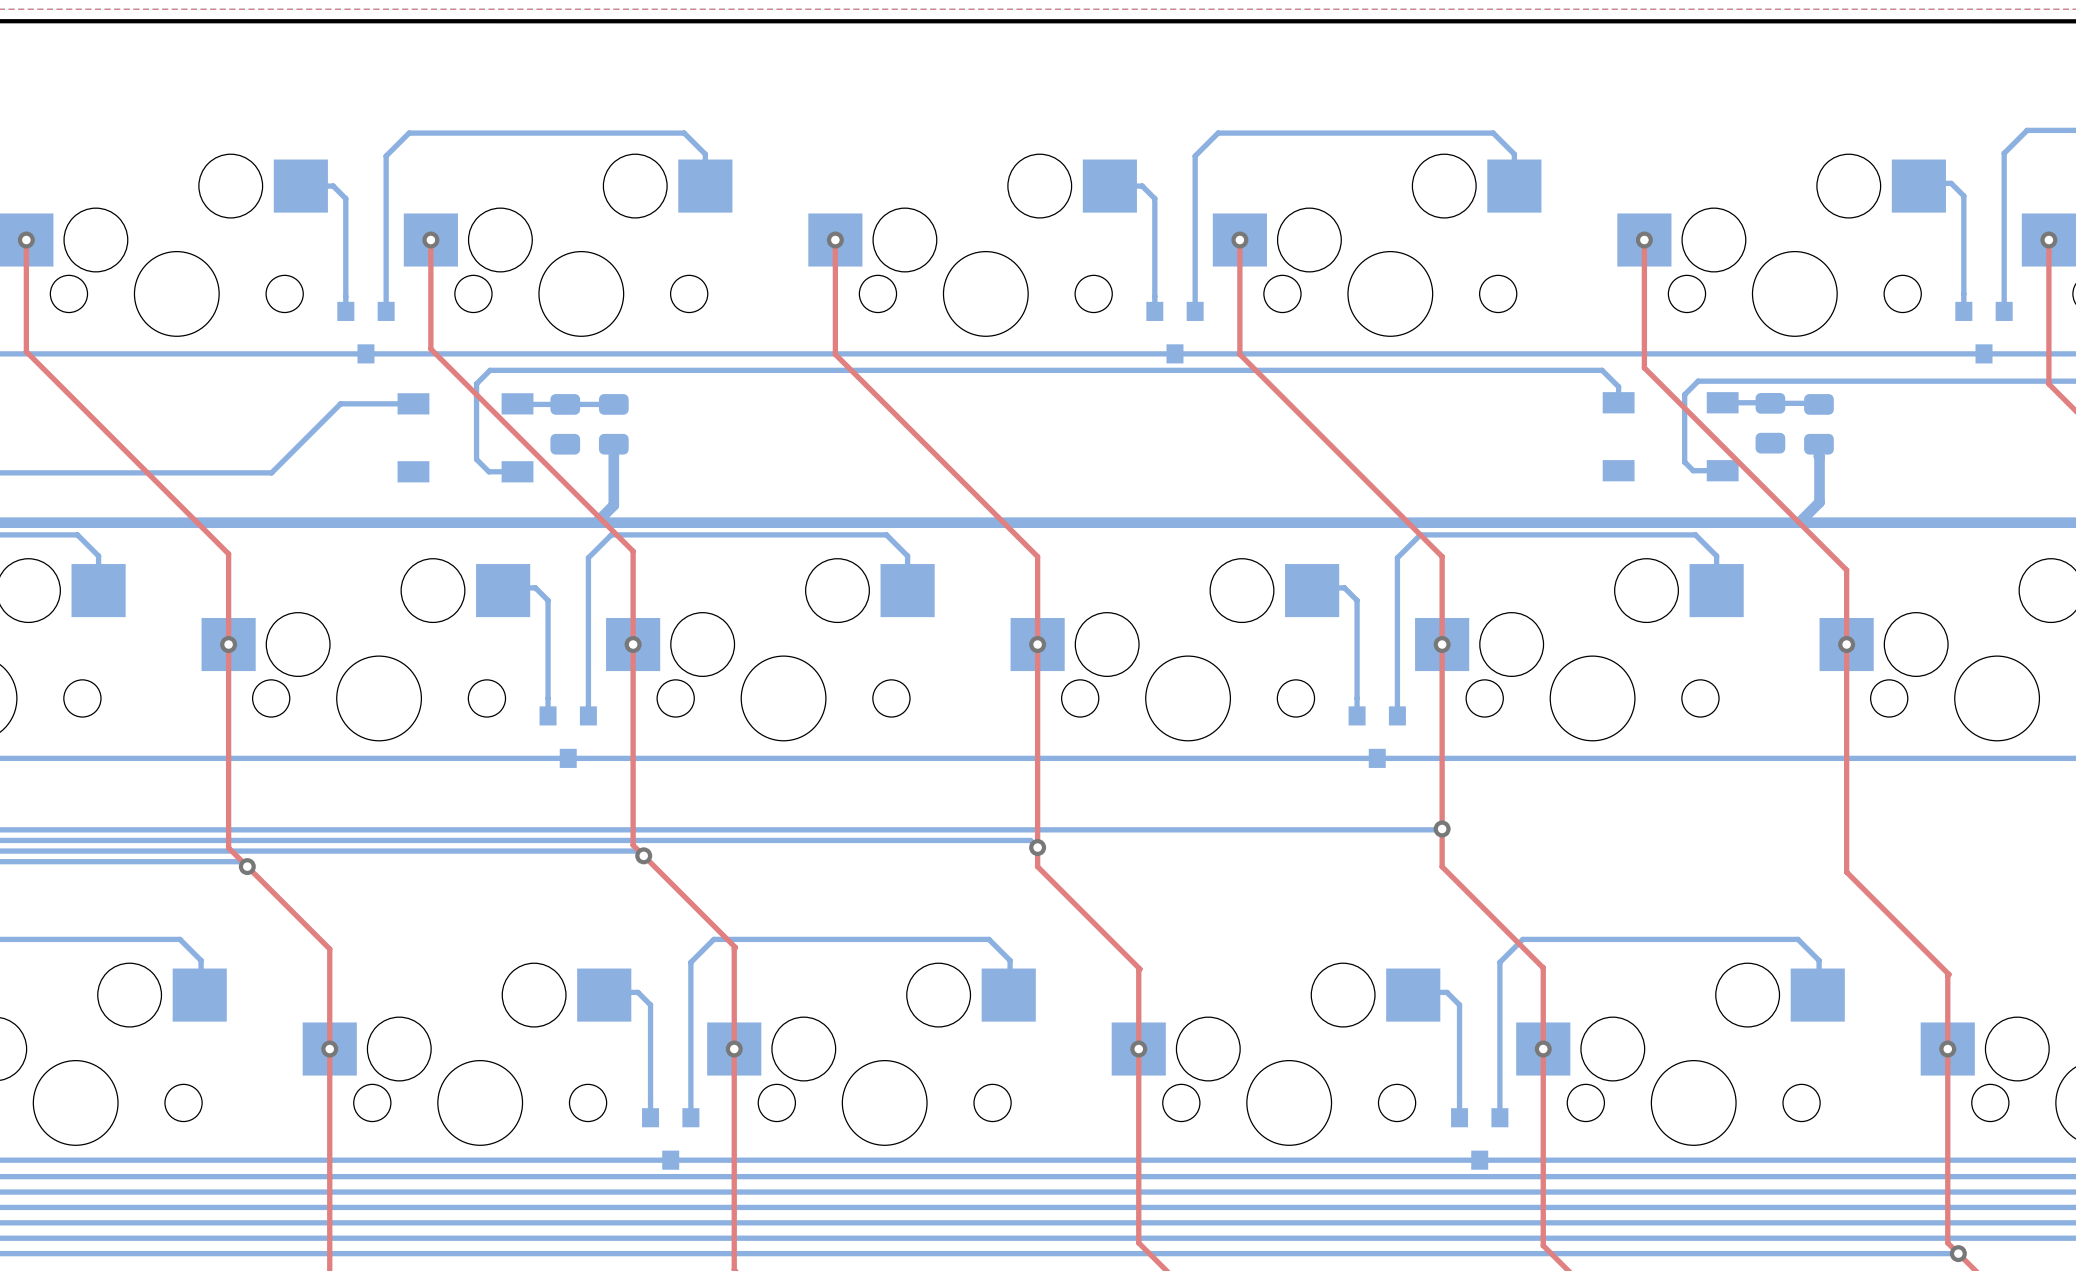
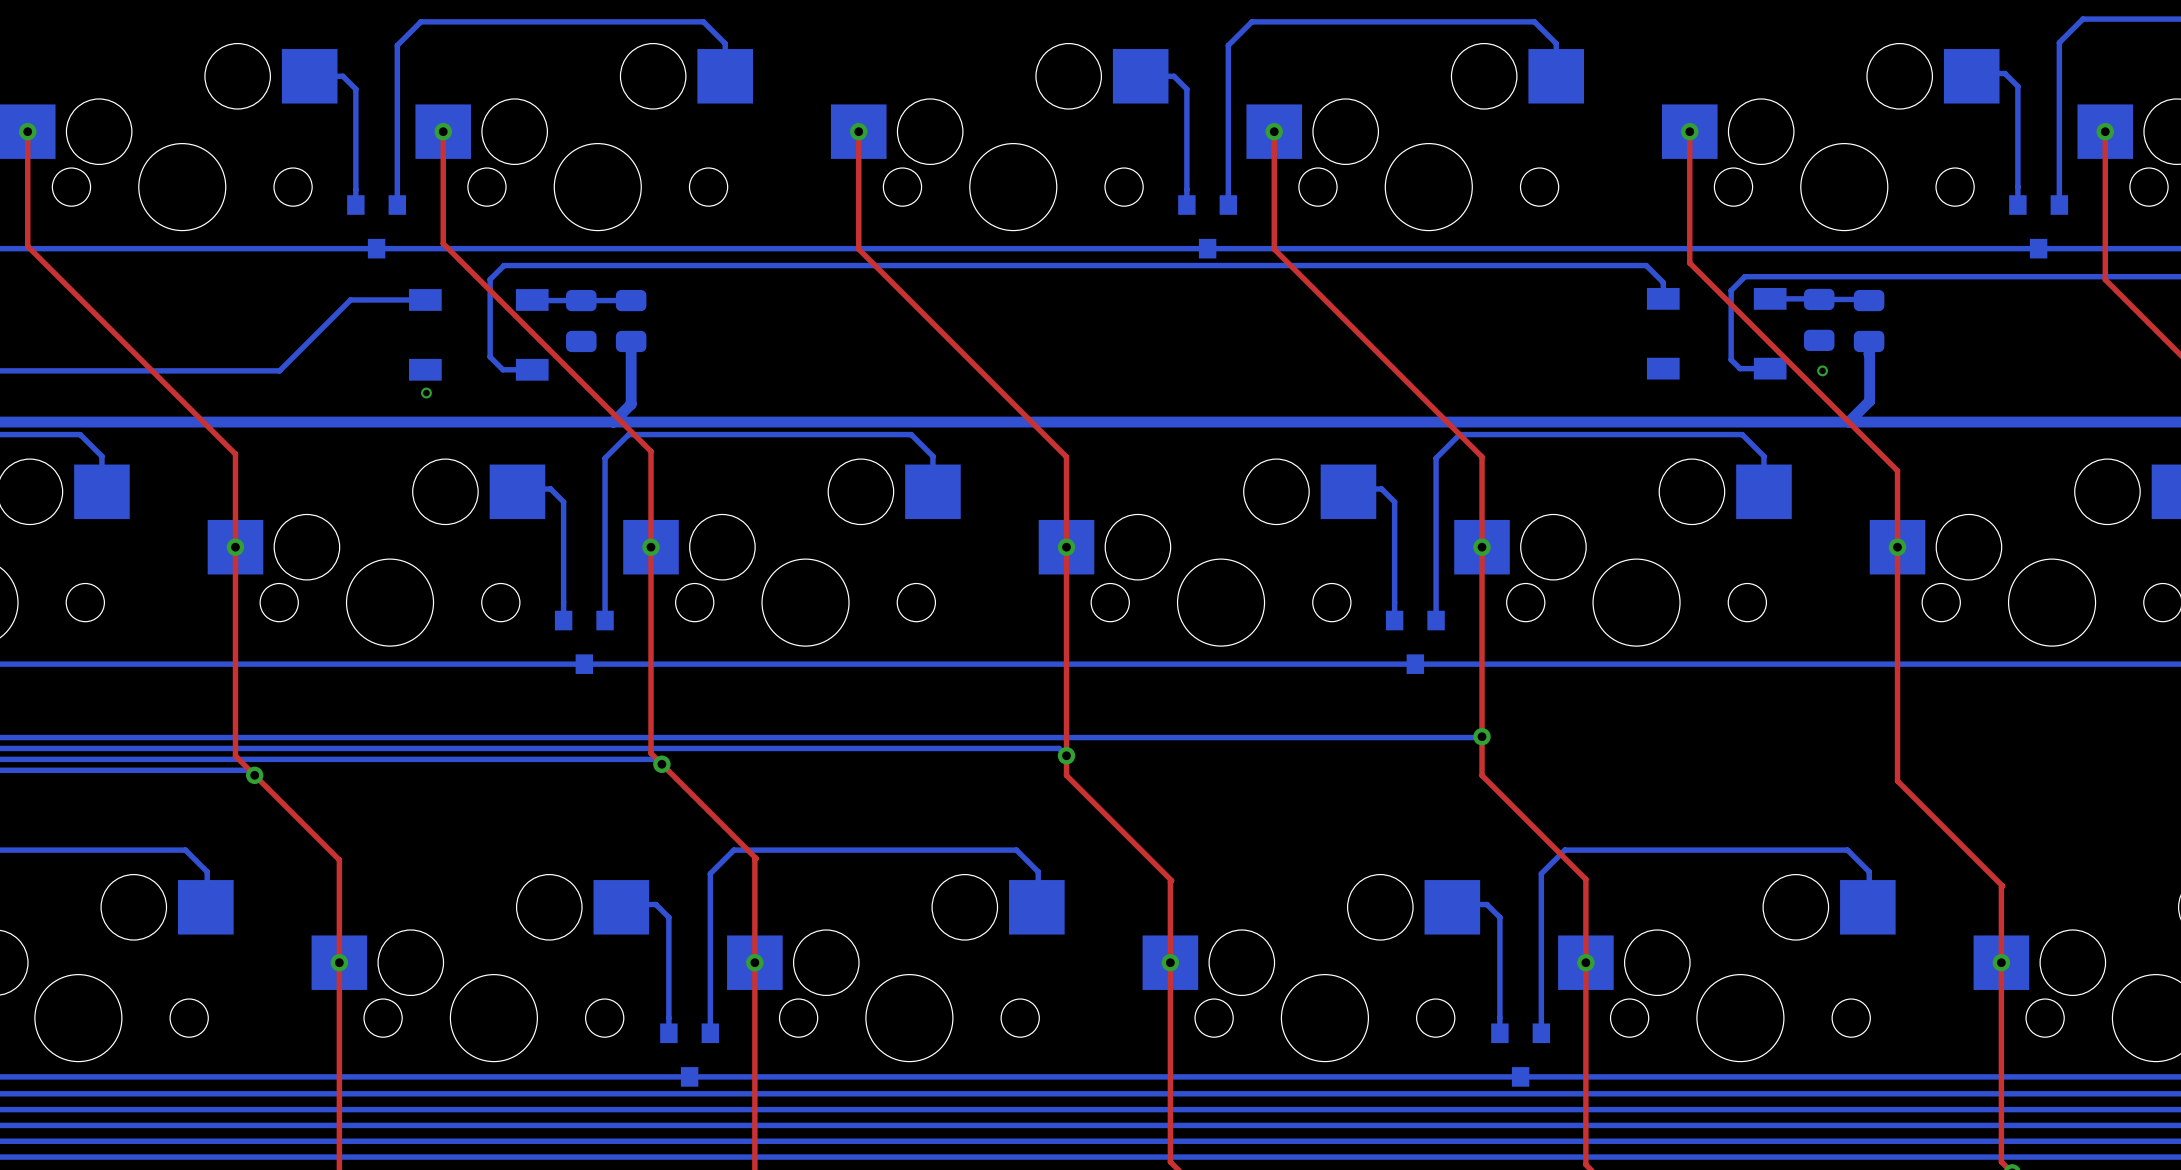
via: none -> (1822, 370)
via: none -> (426, 393)

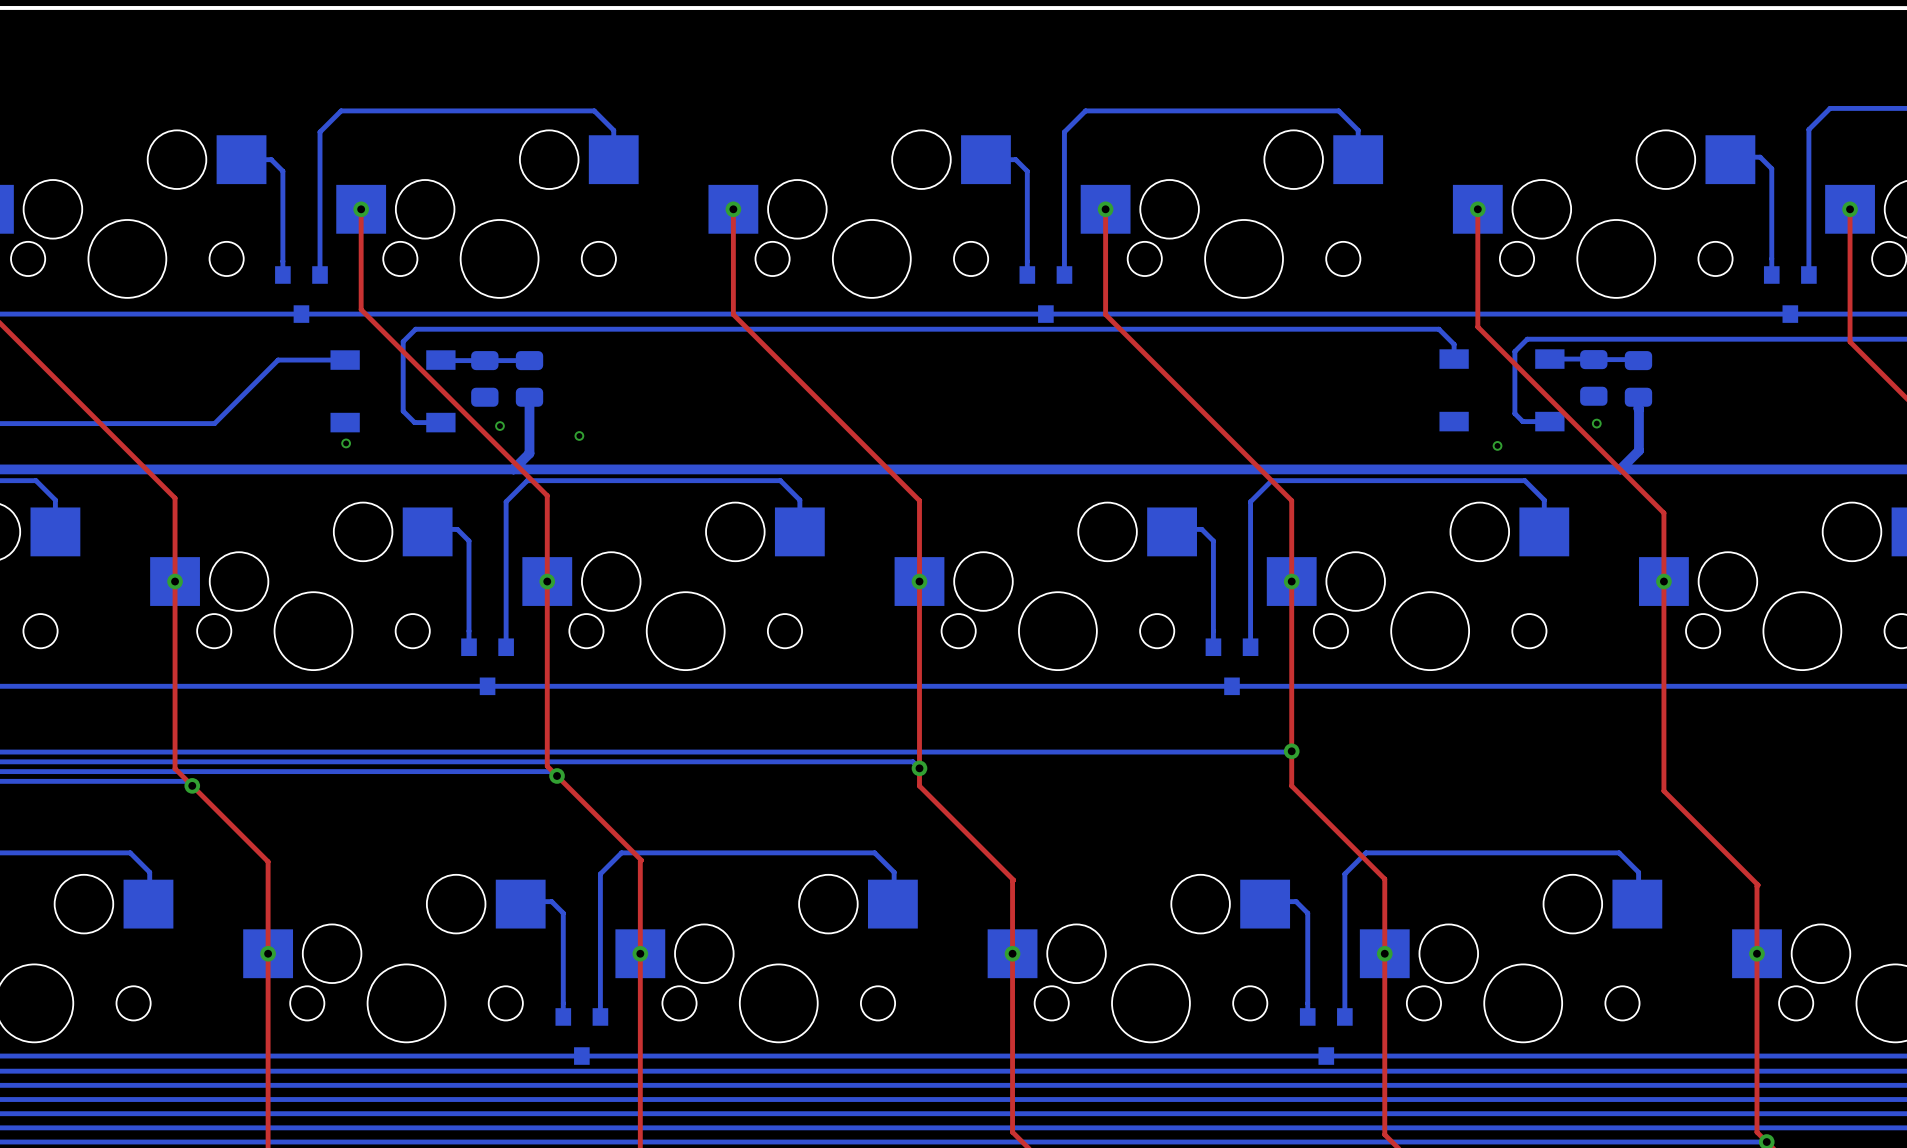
via: none -> (499, 426)
via: none -> (579, 435)
via: none -> (1497, 445)

